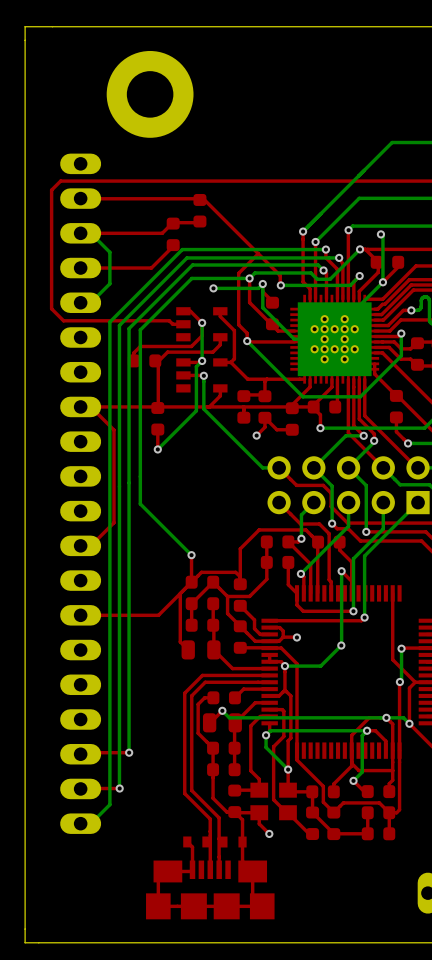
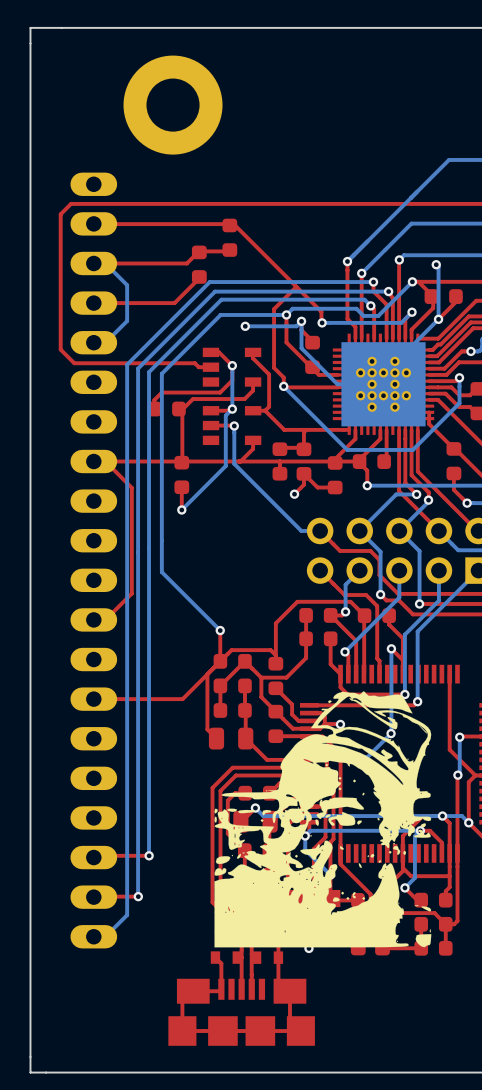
drawing: none -> [214, 691, 432, 948]

